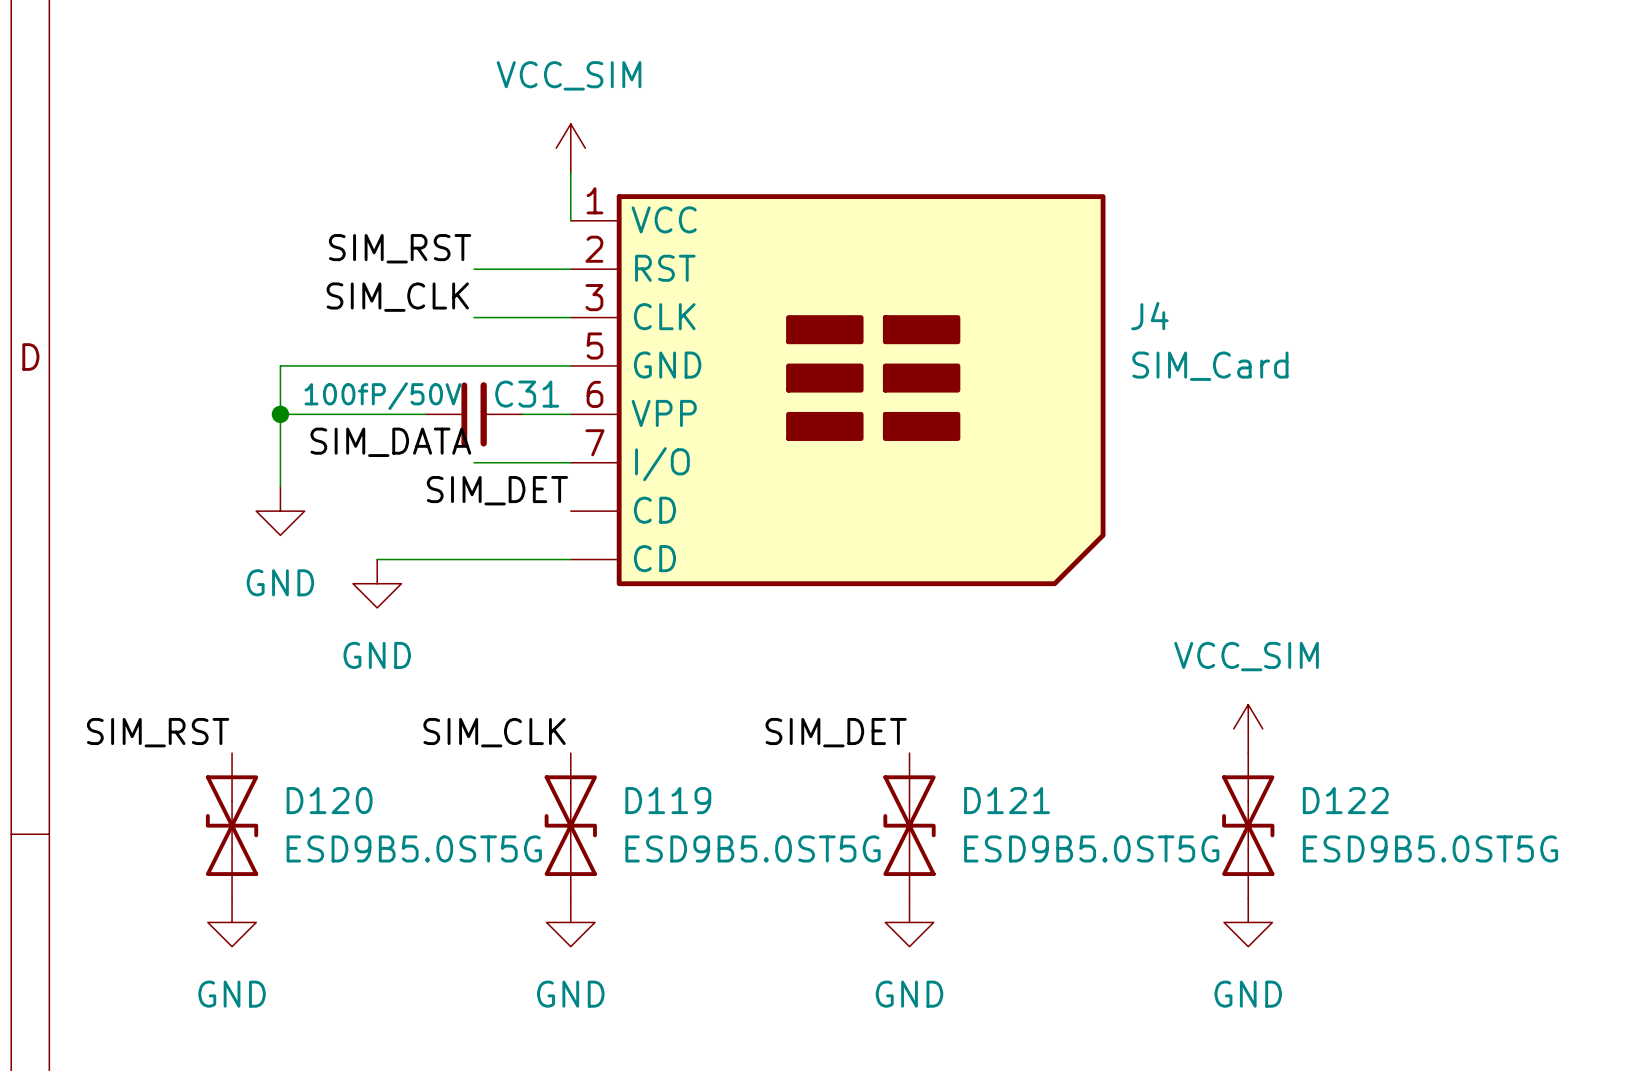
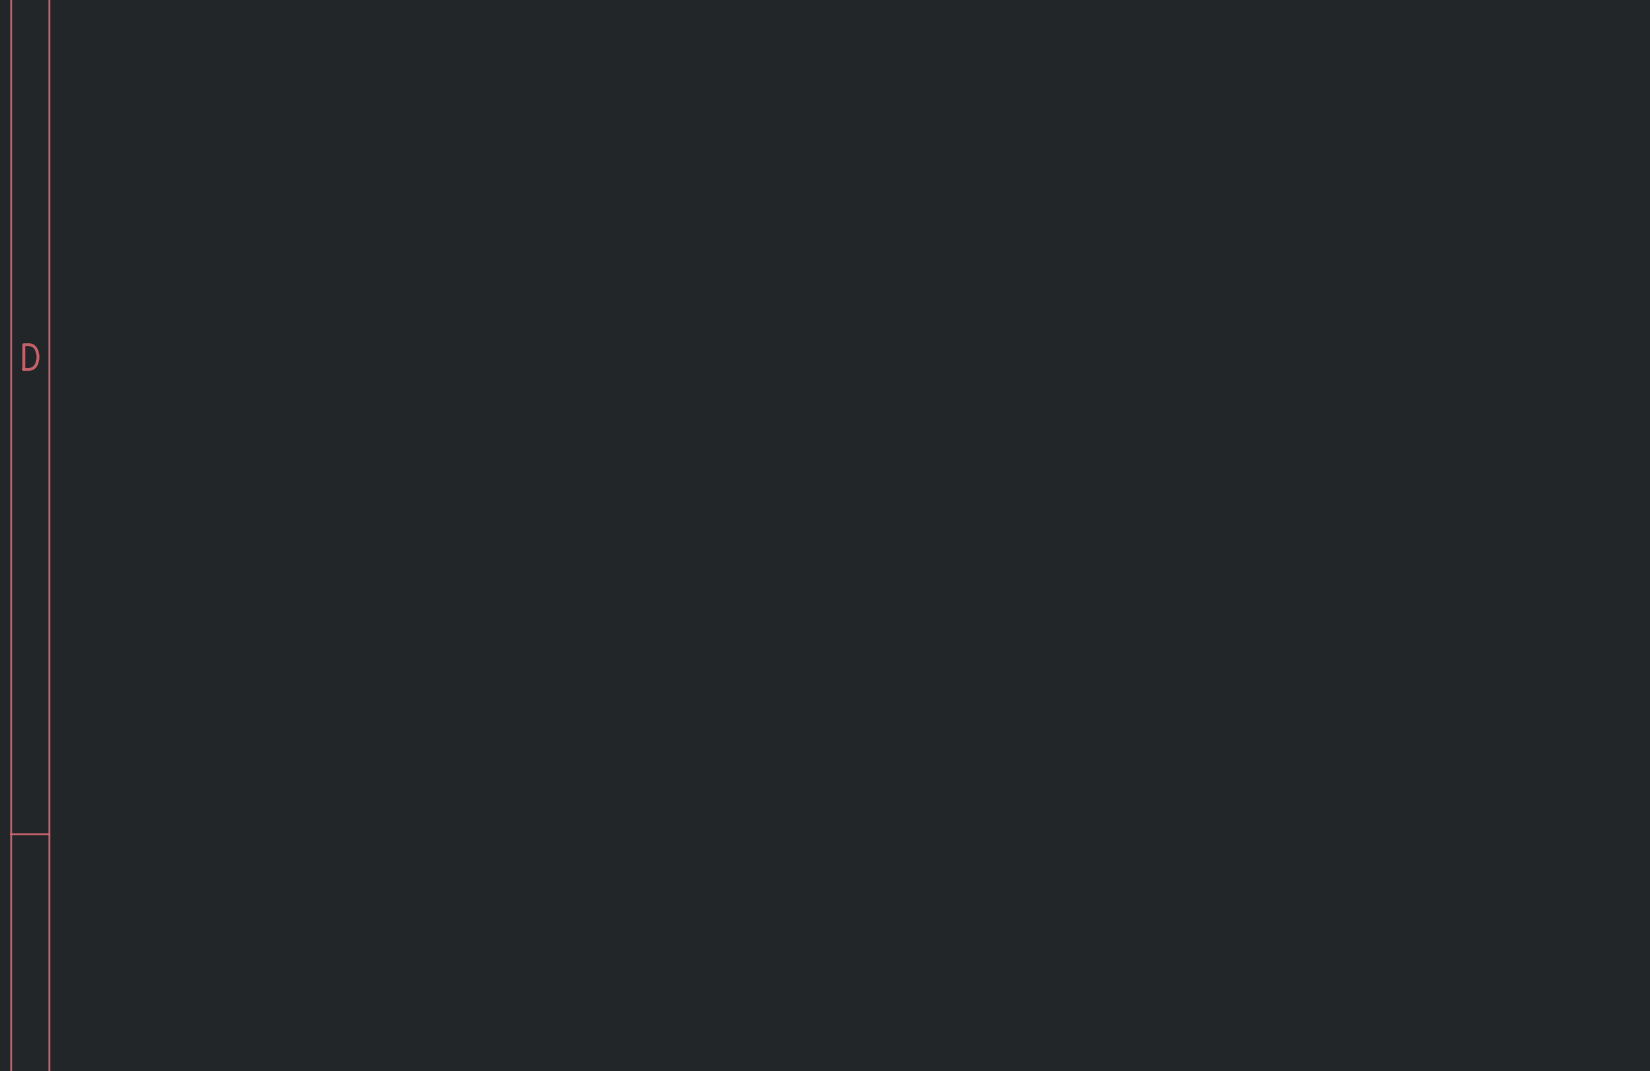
power symbol: VCC_SIM (570, 148) -> none
wire: (570, 172) (570, 220) -> none
label: SIM_RST (400, 248) -> none
wire: (473, 269) (570, 269) -> none
label: SIM_CLK (397, 297) -> none
wire: (473, 317) (570, 317) -> none
wire: (570, 365) (280, 365) (280, 486) -> none
J4: SIM_Card (838, 390) -> none
wire: (280, 414) (425, 414) -> none
junction: (280, 414) -> none
C31: 100fP/50V (473, 414) -> none
wire: (522, 414) (570, 414) -> none
label: SIM_DATA (390, 442) -> none
wire: (473, 462) (570, 462) -> none
label: SIM_DET (497, 490) -> none
power symbol: GND (280, 511) -> none
wire: (377, 559) (570, 559) -> none
power symbol: GND (377, 583) -> none
power symbol: VCC_SIM (1248, 728) -> none
label: SIM_RST (158, 732) -> none
label: SIM_CLK (494, 732) -> none
label: SIM_DET (836, 732) -> none
D120: ESD9B5.0ST5G (232, 825) -> none
D119: ESD9B5.0ST5G (570, 825) -> none
D121: ESD9B5.0ST5G (909, 825) -> none
D122: ESD9B5.0ST5G (1248, 825) -> none
power symbol: GND (232, 922) -> none
power symbol: GND (570, 922) -> none
power symbol: GND (909, 922) -> none
power symbol: GND (1248, 922) -> none

